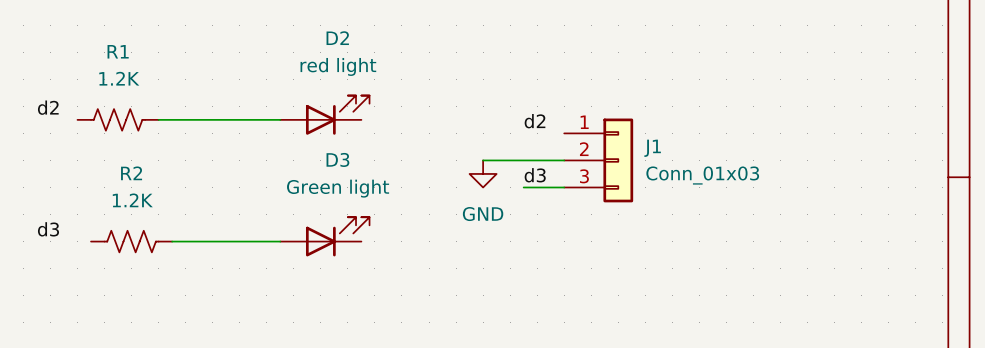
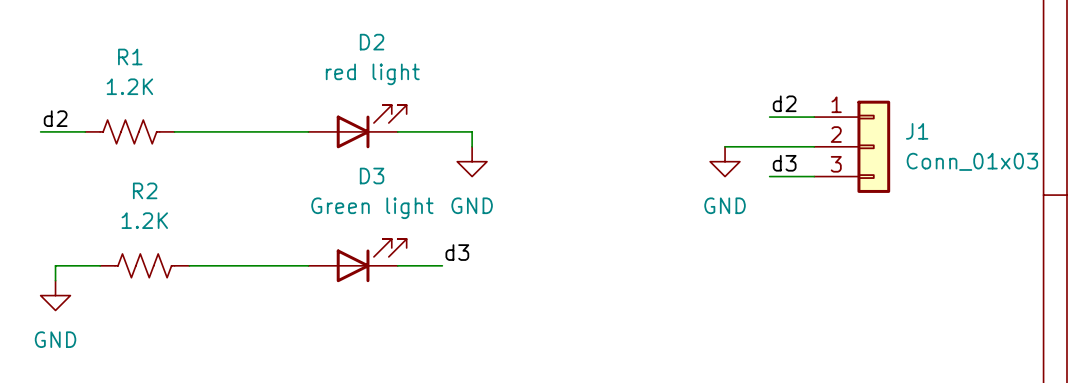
wire: none -> (769, 117) (814, 117)
wire: none -> (40, 131) (85, 131)
wire: none -> (397, 131) (472, 131) (472, 146)
label position: d2 (535, 121) -> d2 (784, 103)
power symbol: none -> GND (725, 161)
label: none -> d3 (784, 163)
wire: (483, 160) (564, 160) -> (725, 146) (814, 146)
J1 position: (598, 160) -> (852, 146)
power symbol position: GND (483, 173) -> GND (472, 161)
label: d3 (535, 175) -> none
wire: (523, 187) (564, 187) -> (769, 176) (814, 176)
label: d3 (48, 229) -> none
label: none -> d3 (457, 252)
wire: none -> (100, 265) (55, 265) (55, 280)
wire: none -> (397, 265) (442, 265)
power symbol: none -> GND (55, 295)

